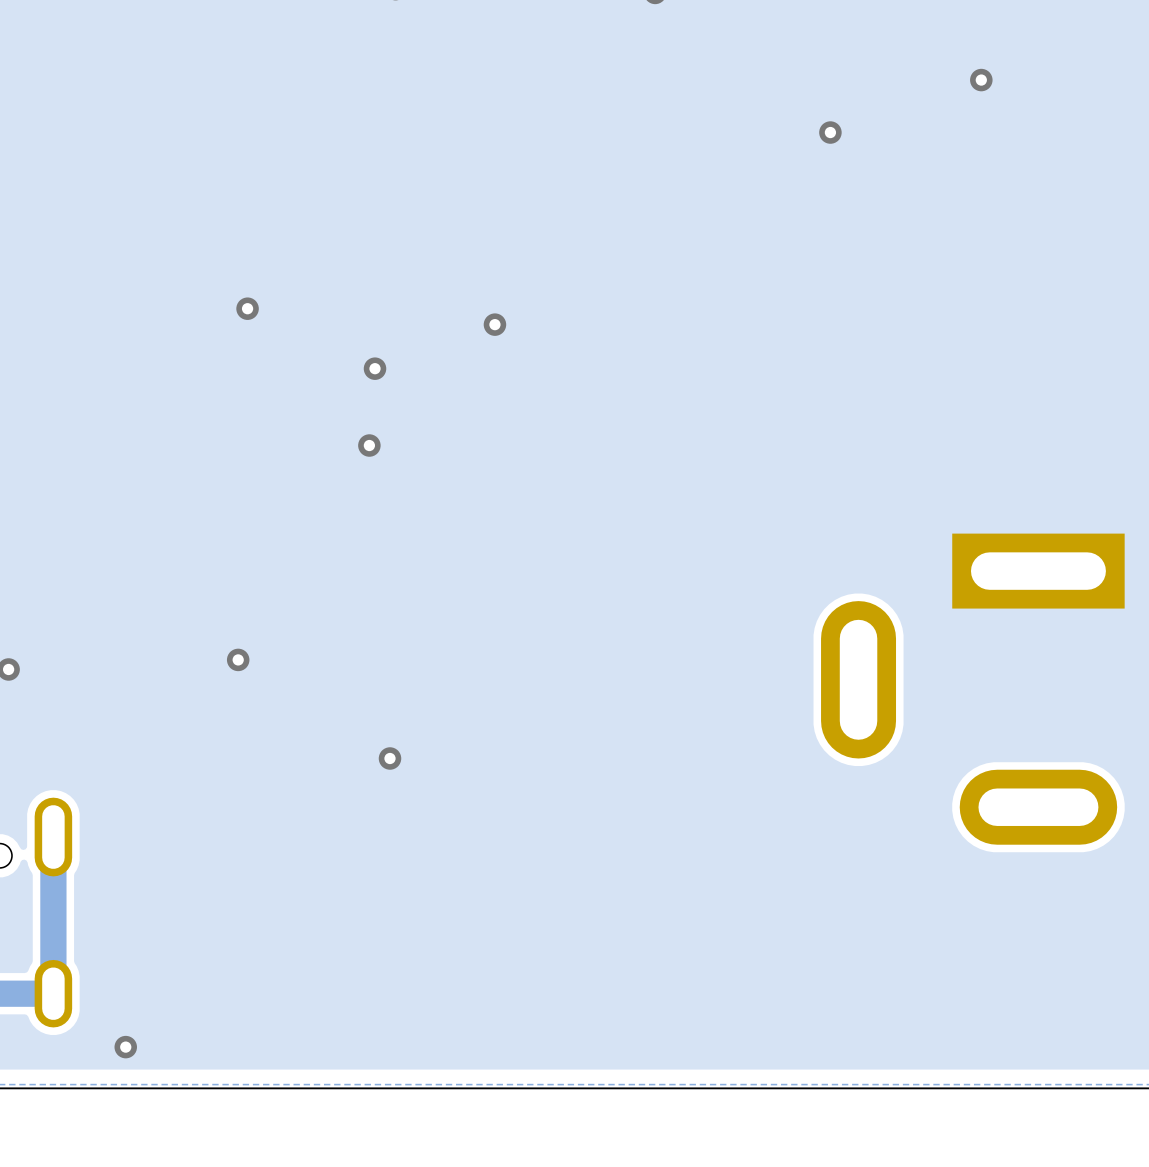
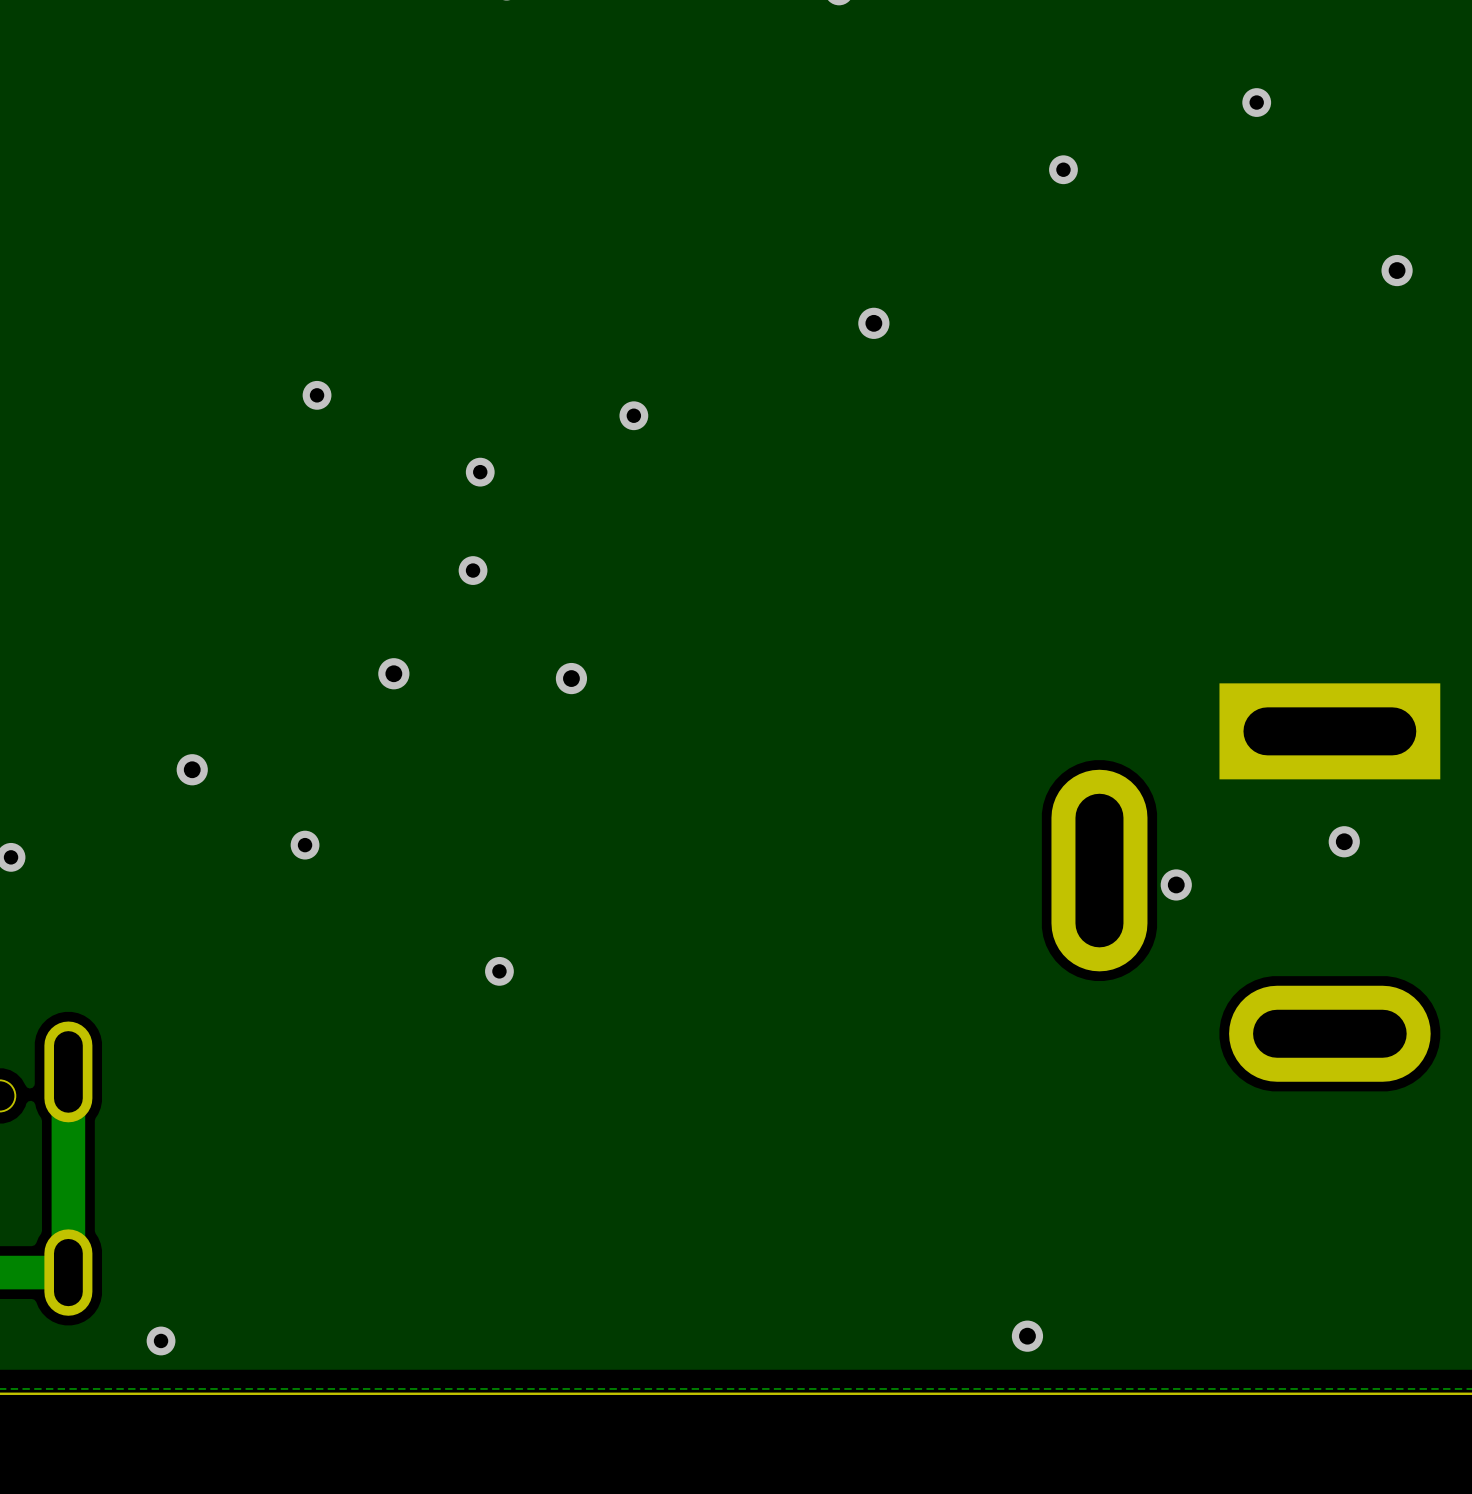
via: none -> (1397, 270)
via: none -> (873, 323)
via: none -> (393, 673)
via: none -> (571, 678)
via: none -> (192, 769)
via: none -> (1344, 841)
via: none -> (1176, 884)
via: none -> (1027, 1336)

